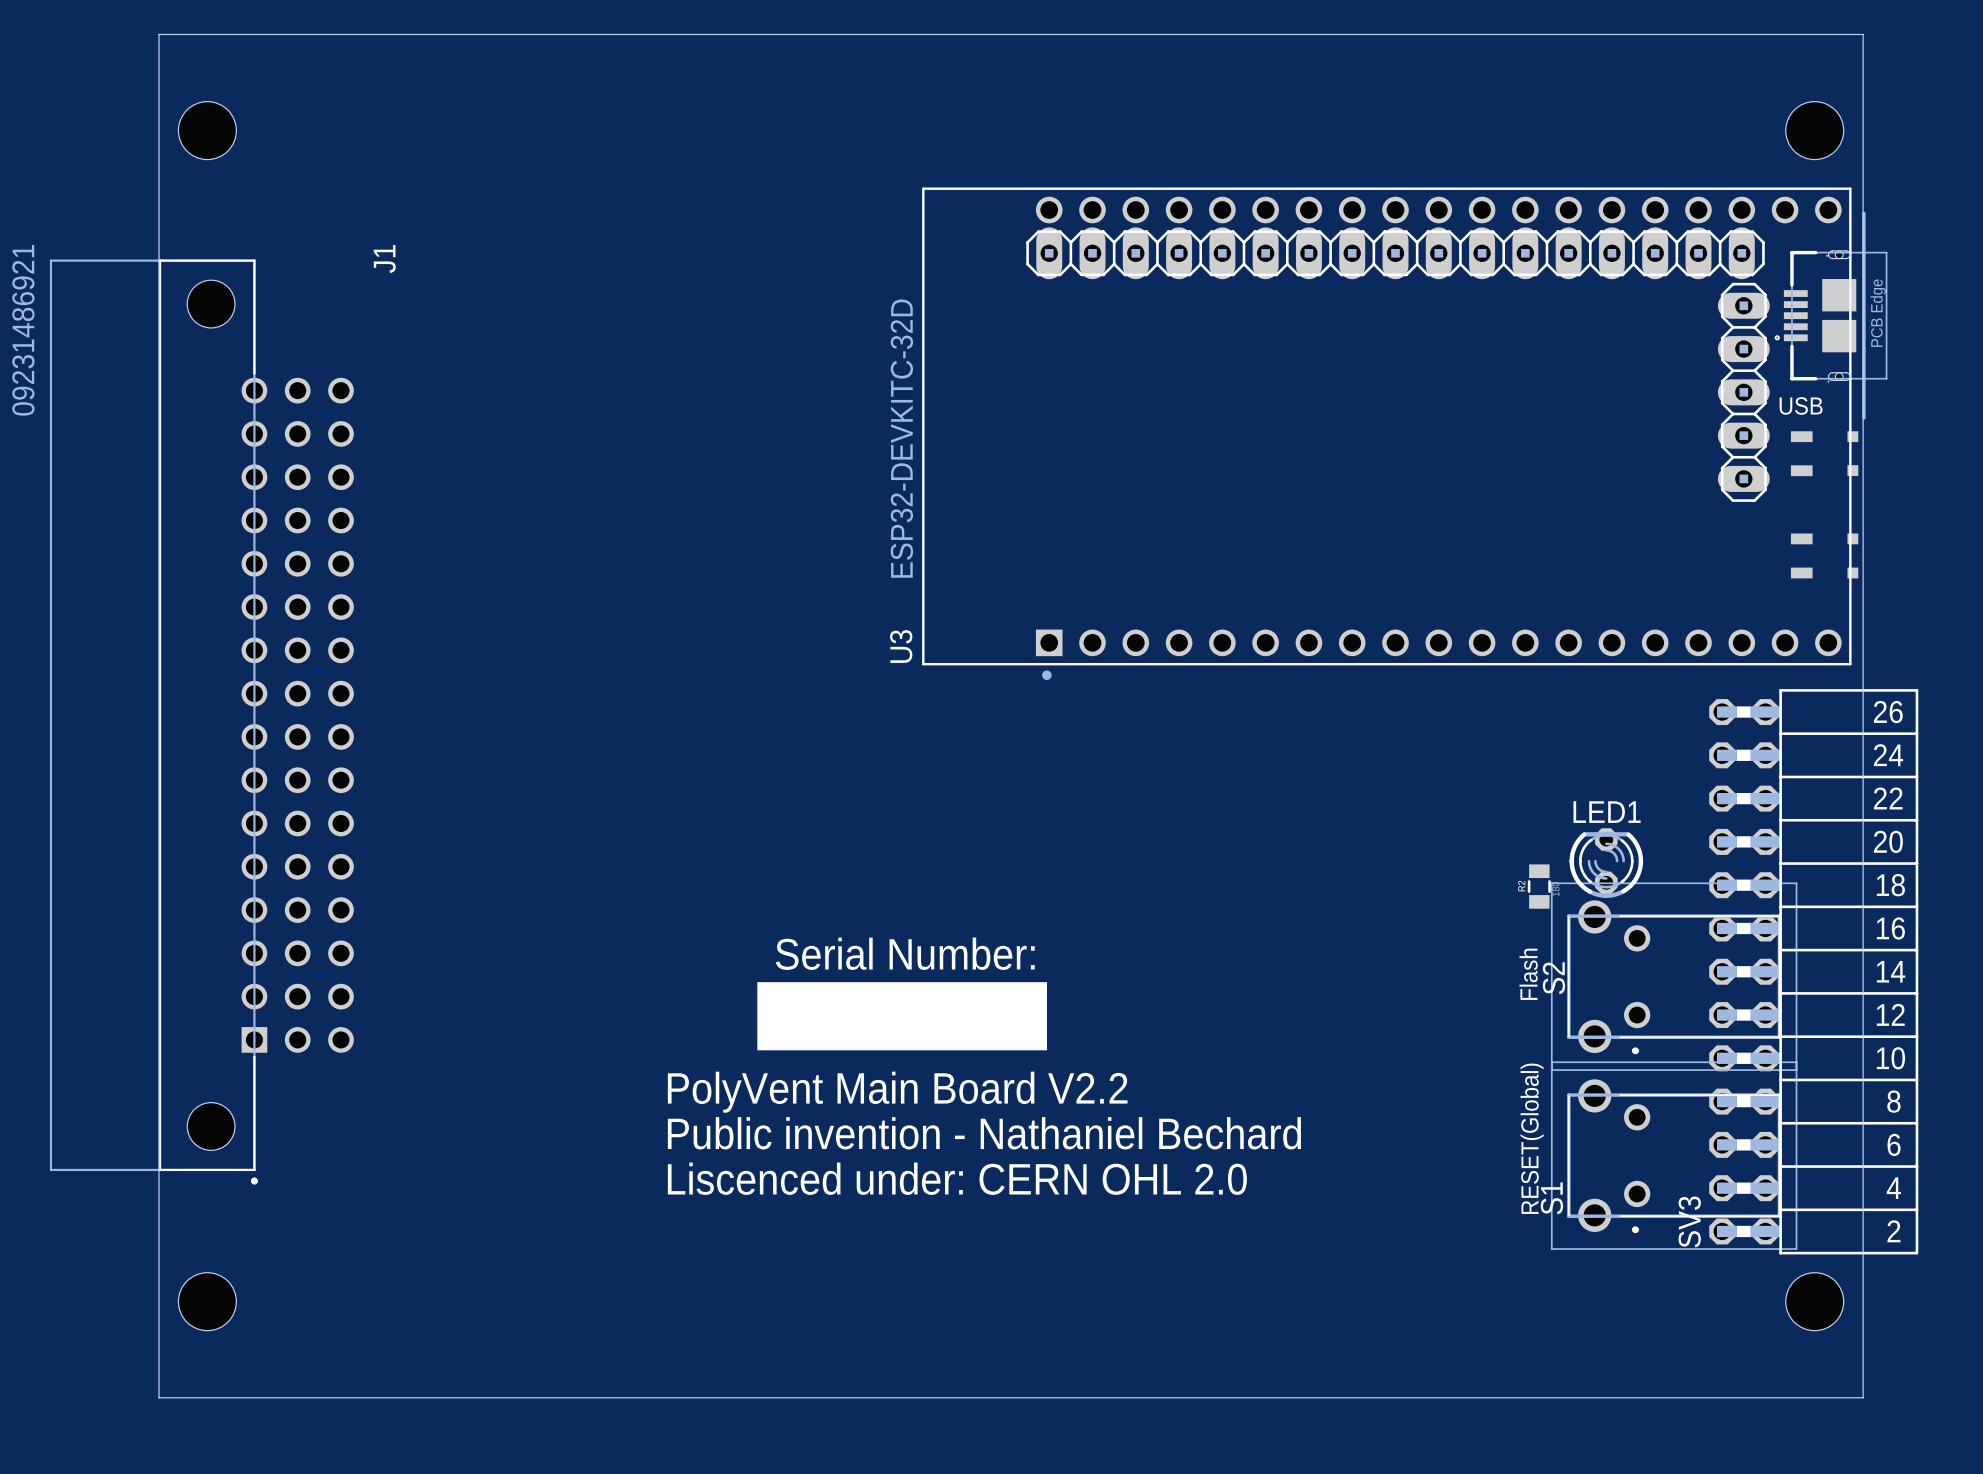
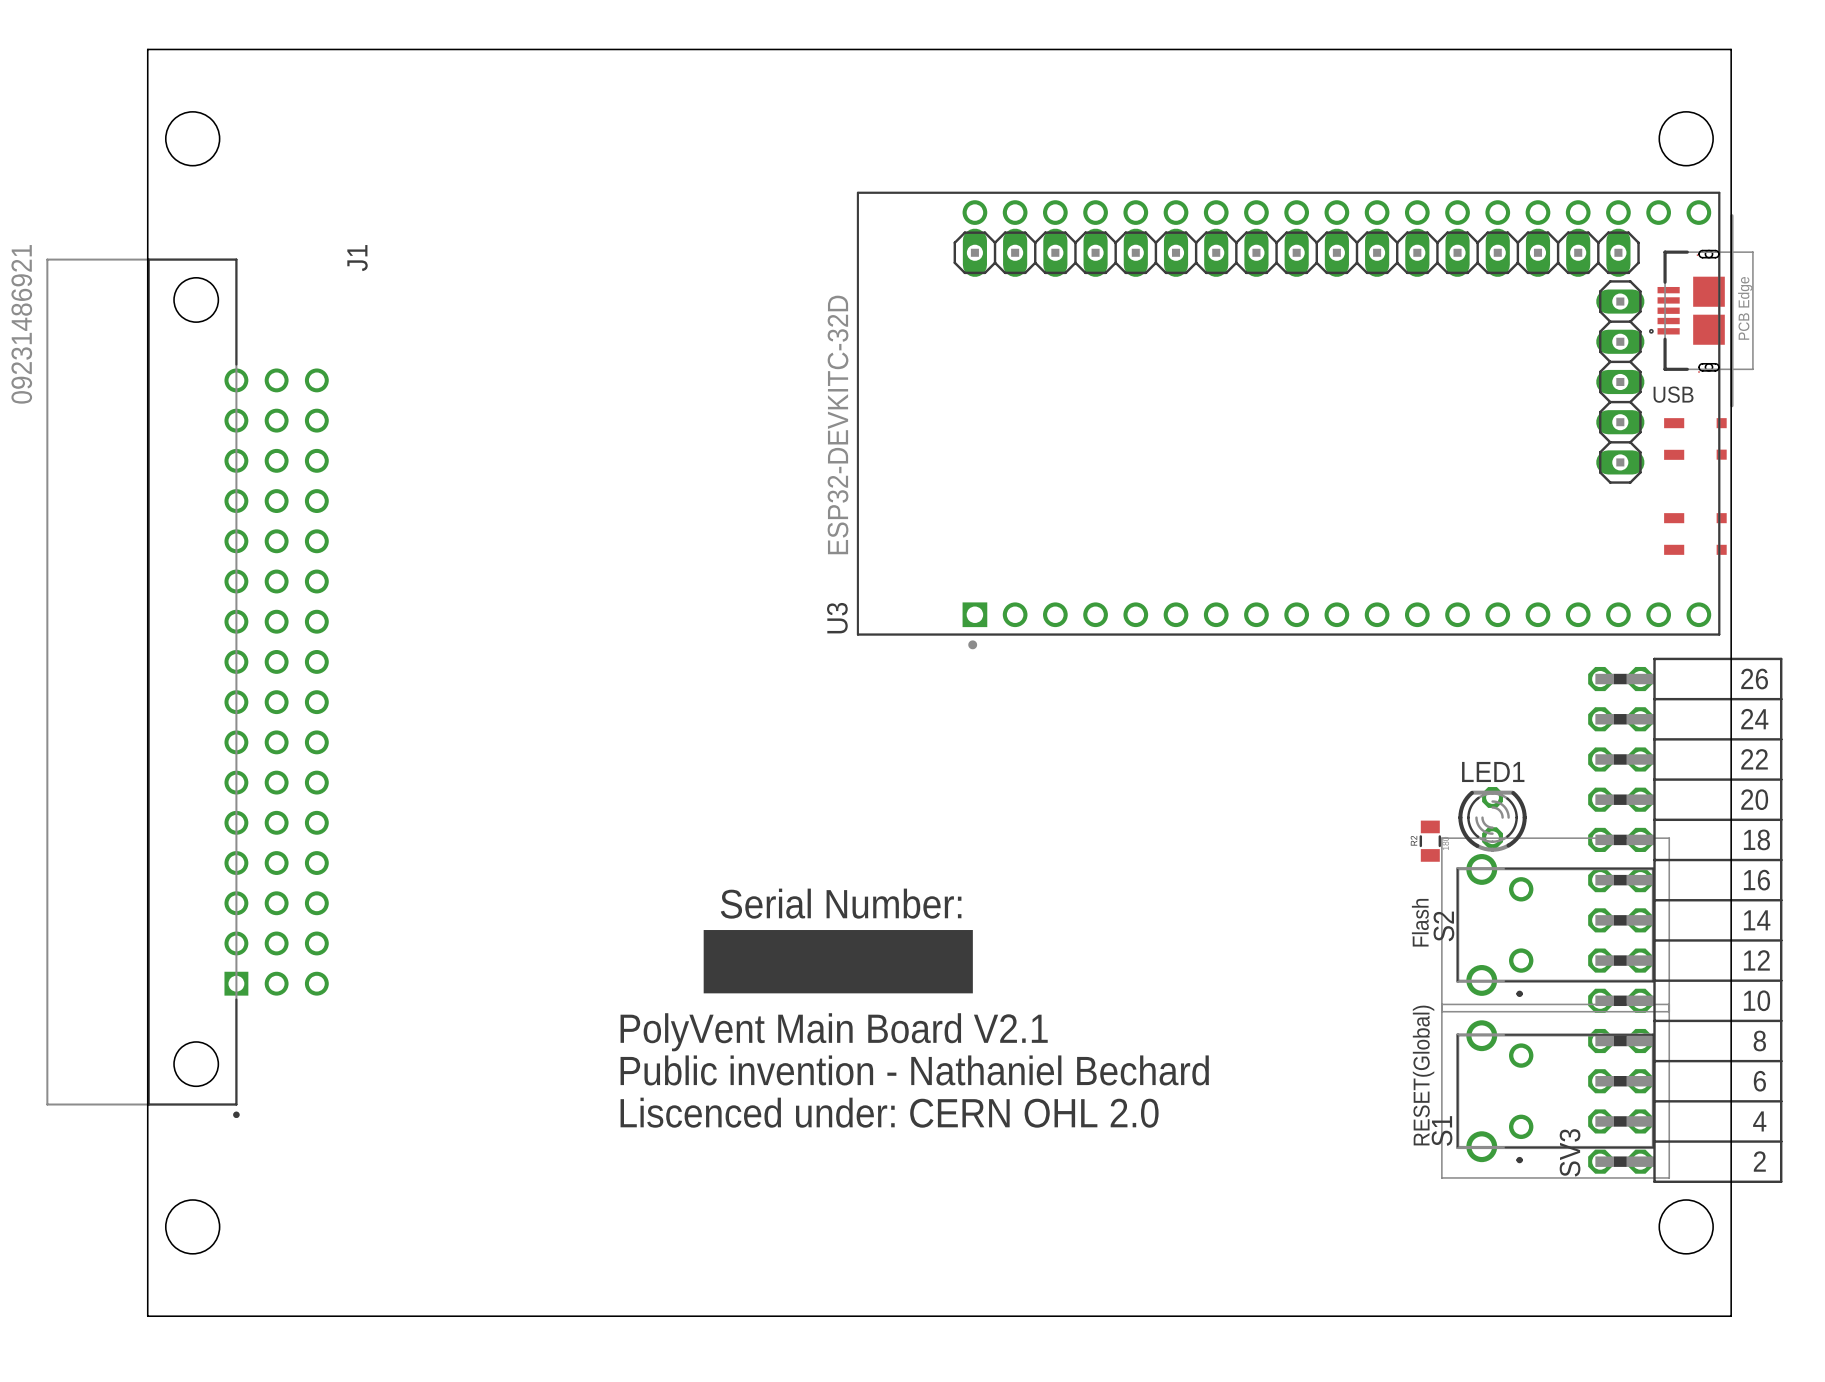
text: PolyVent Main Board V2.2 (897, 1092) -> PolyVent Main Board V2.1 (834, 1032)

